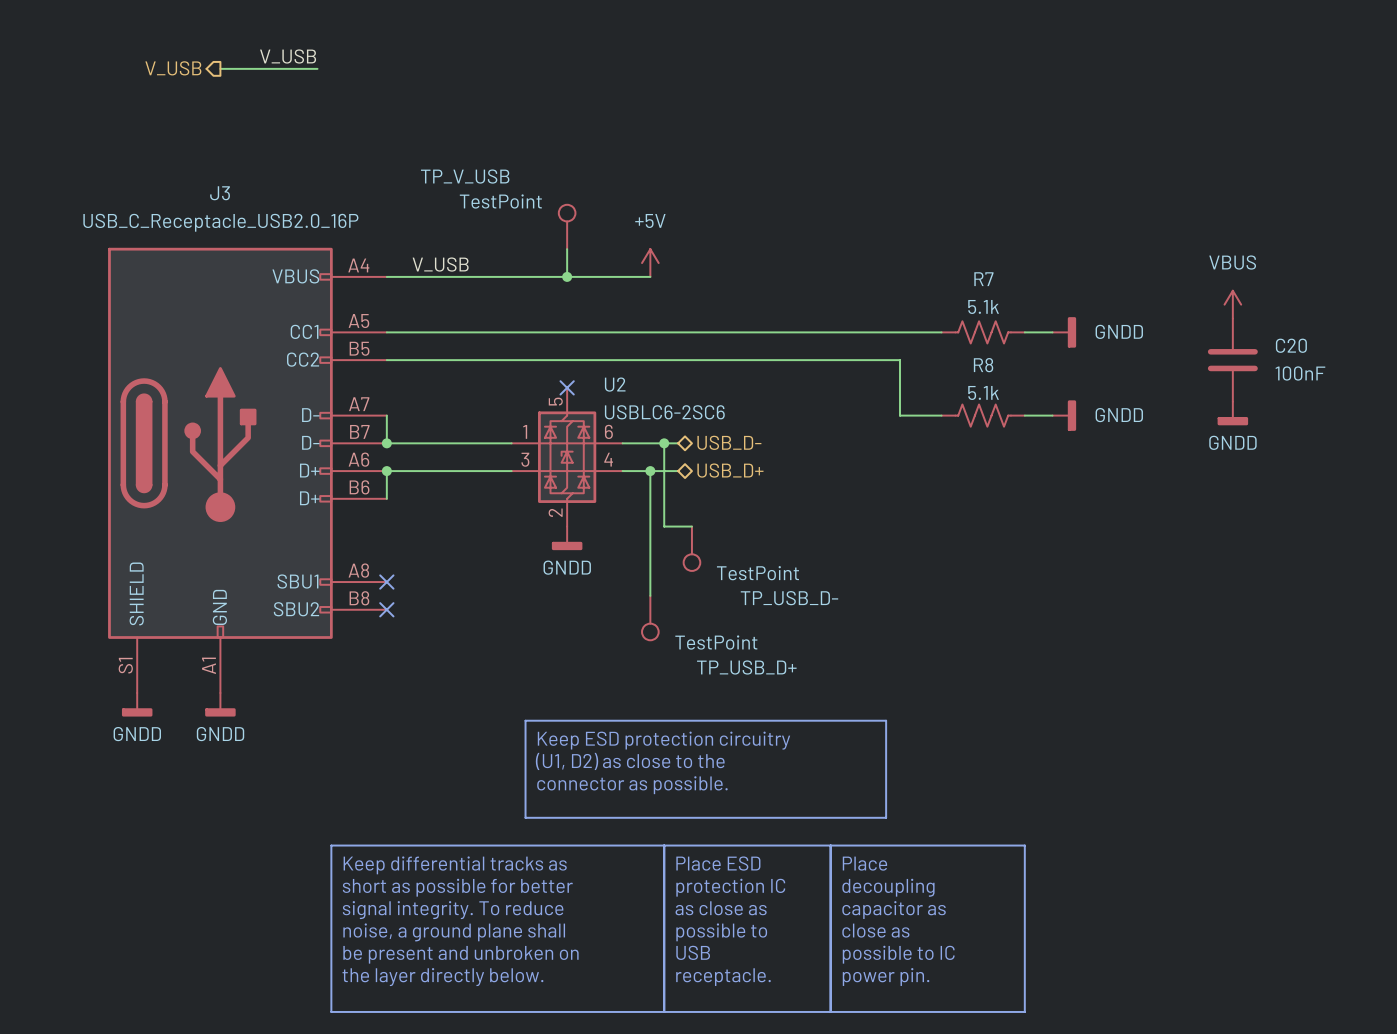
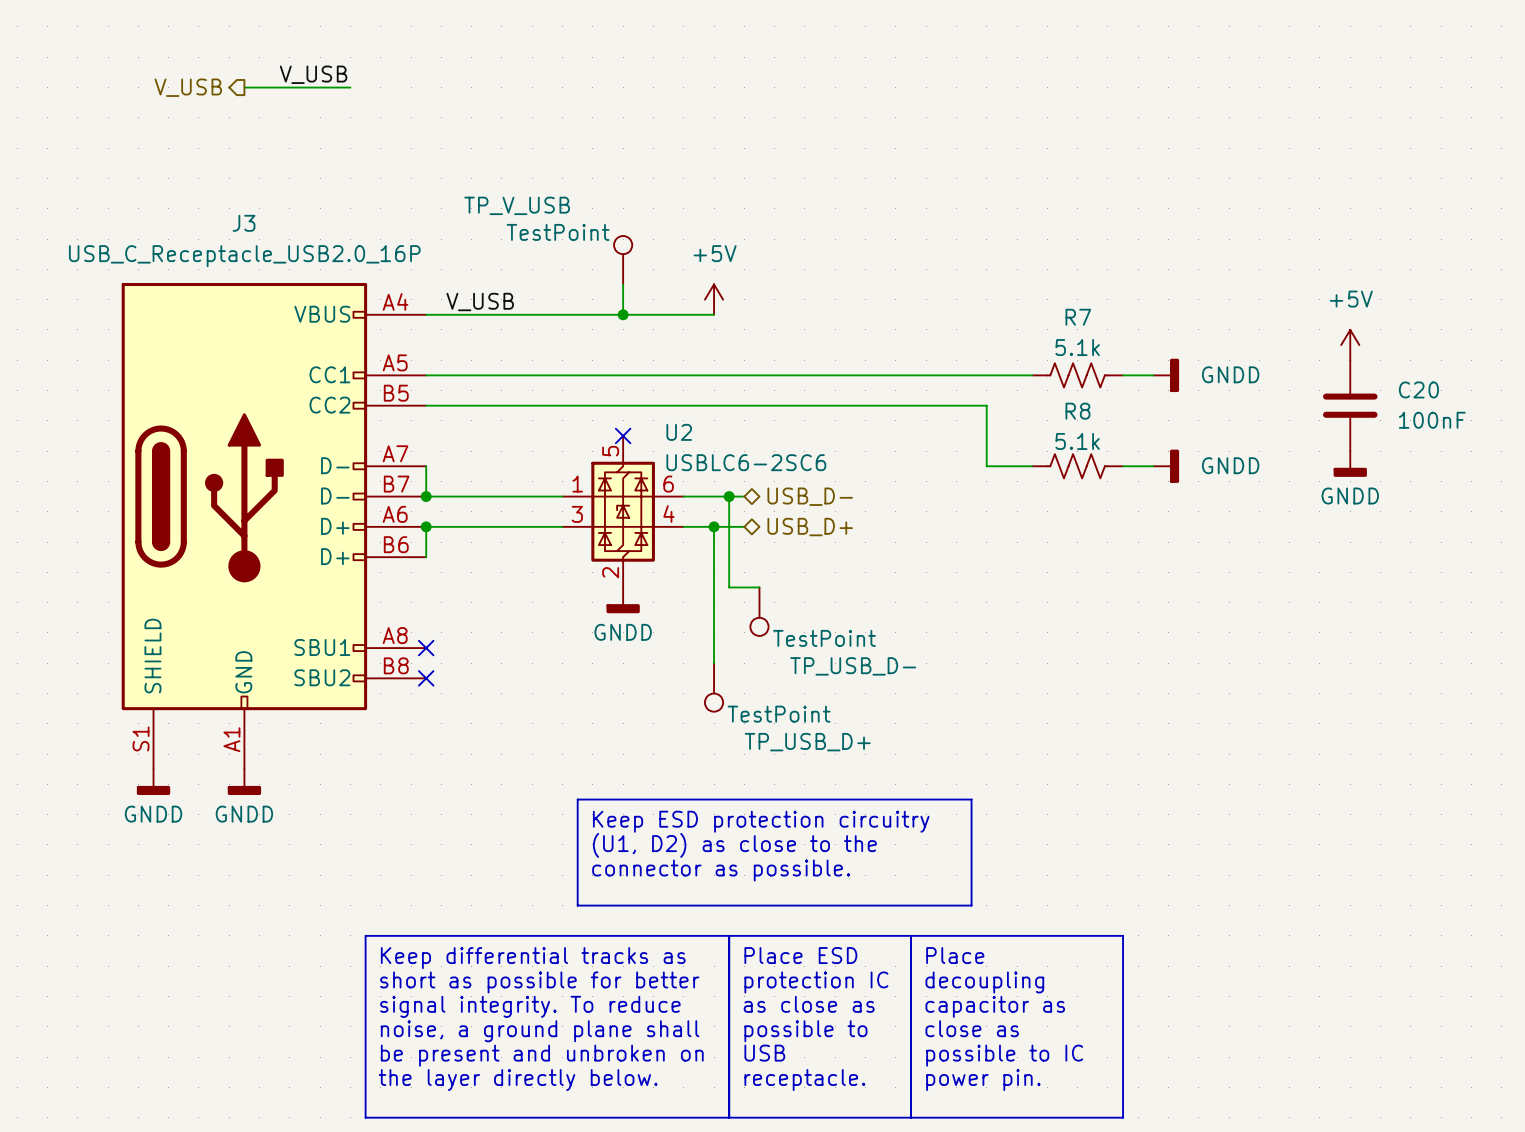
power symbol: VBUS (1232, 304) -> +5V (1350, 345)

